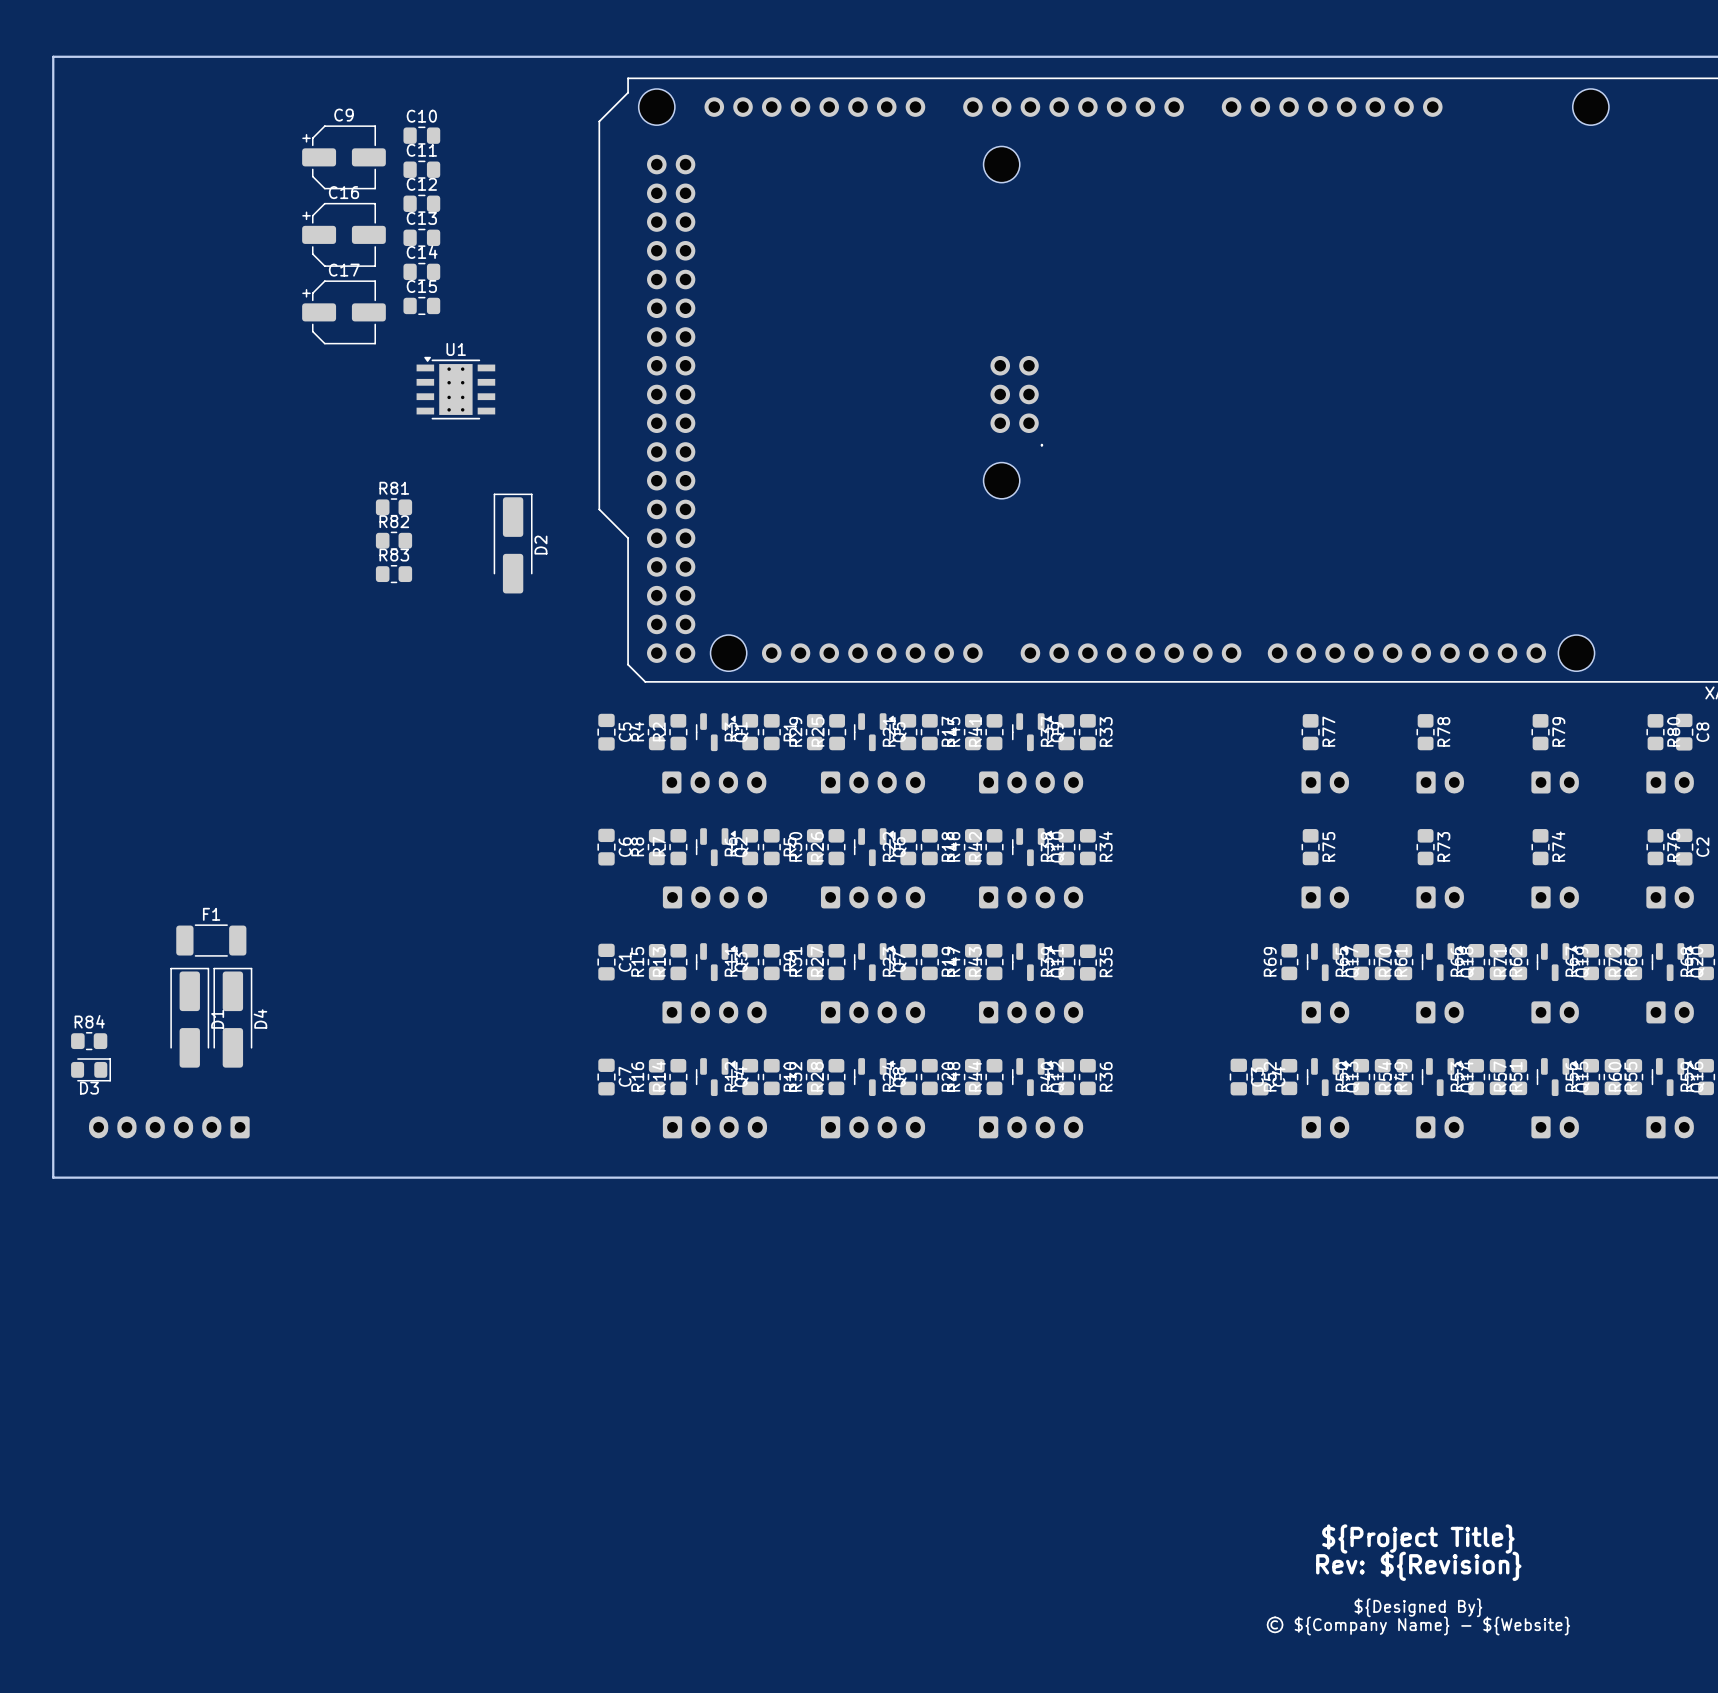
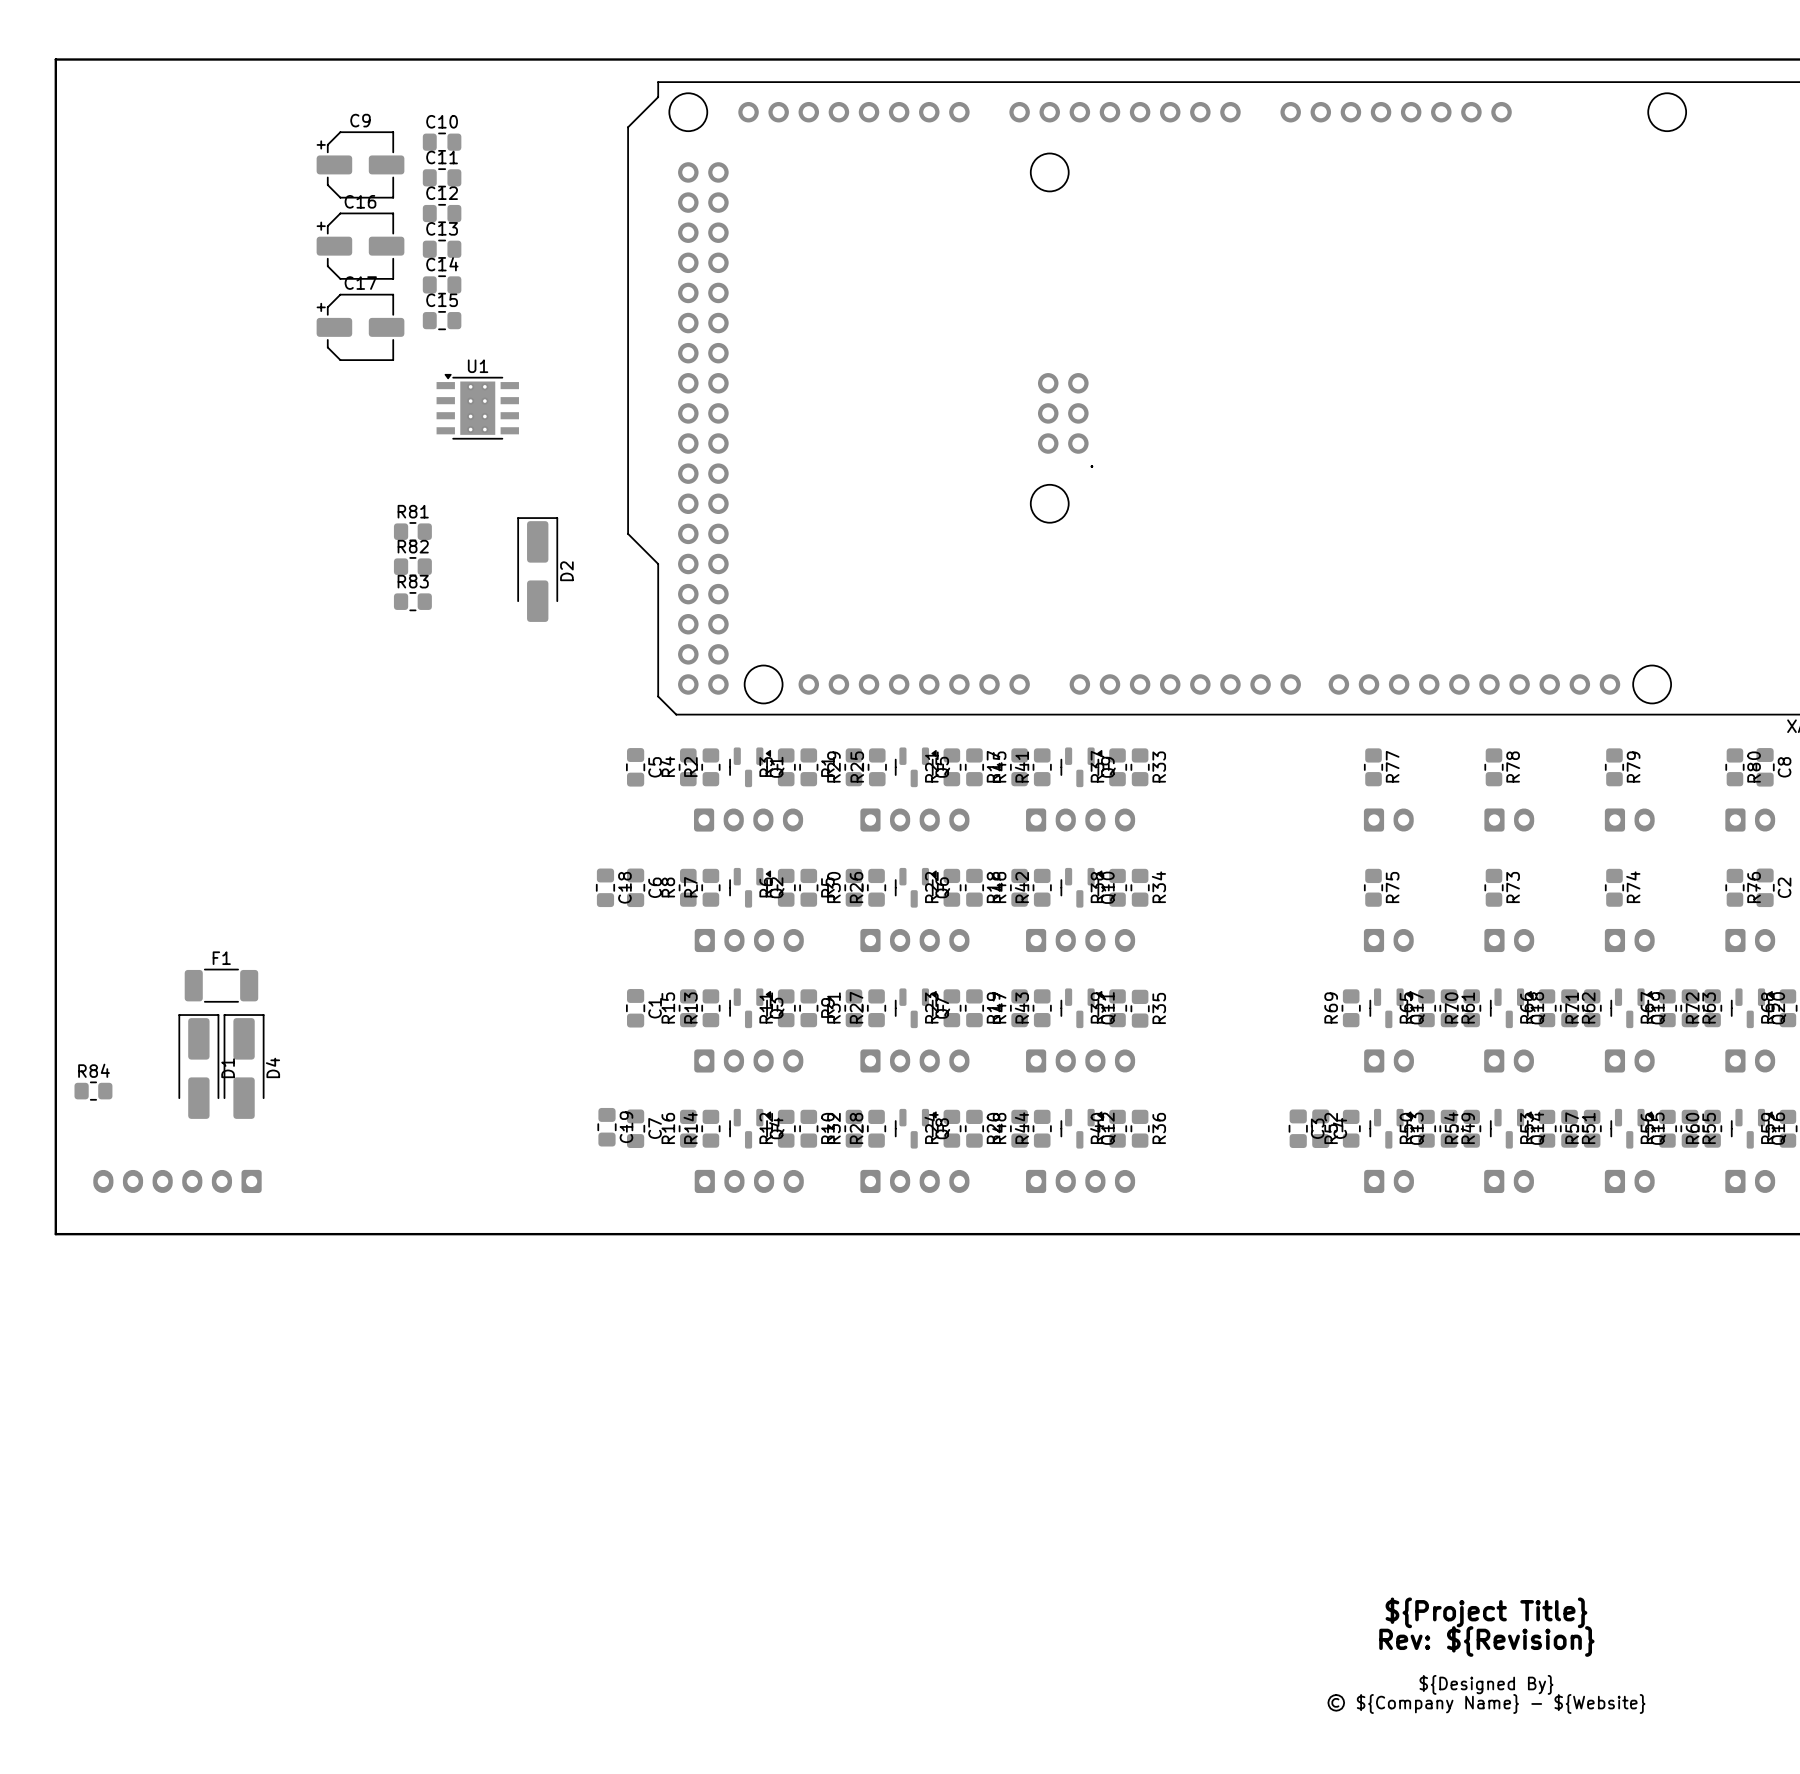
C18: none -> (605, 887)
D3: (90, 1069) -> none
C19: none -> (606, 1127)

